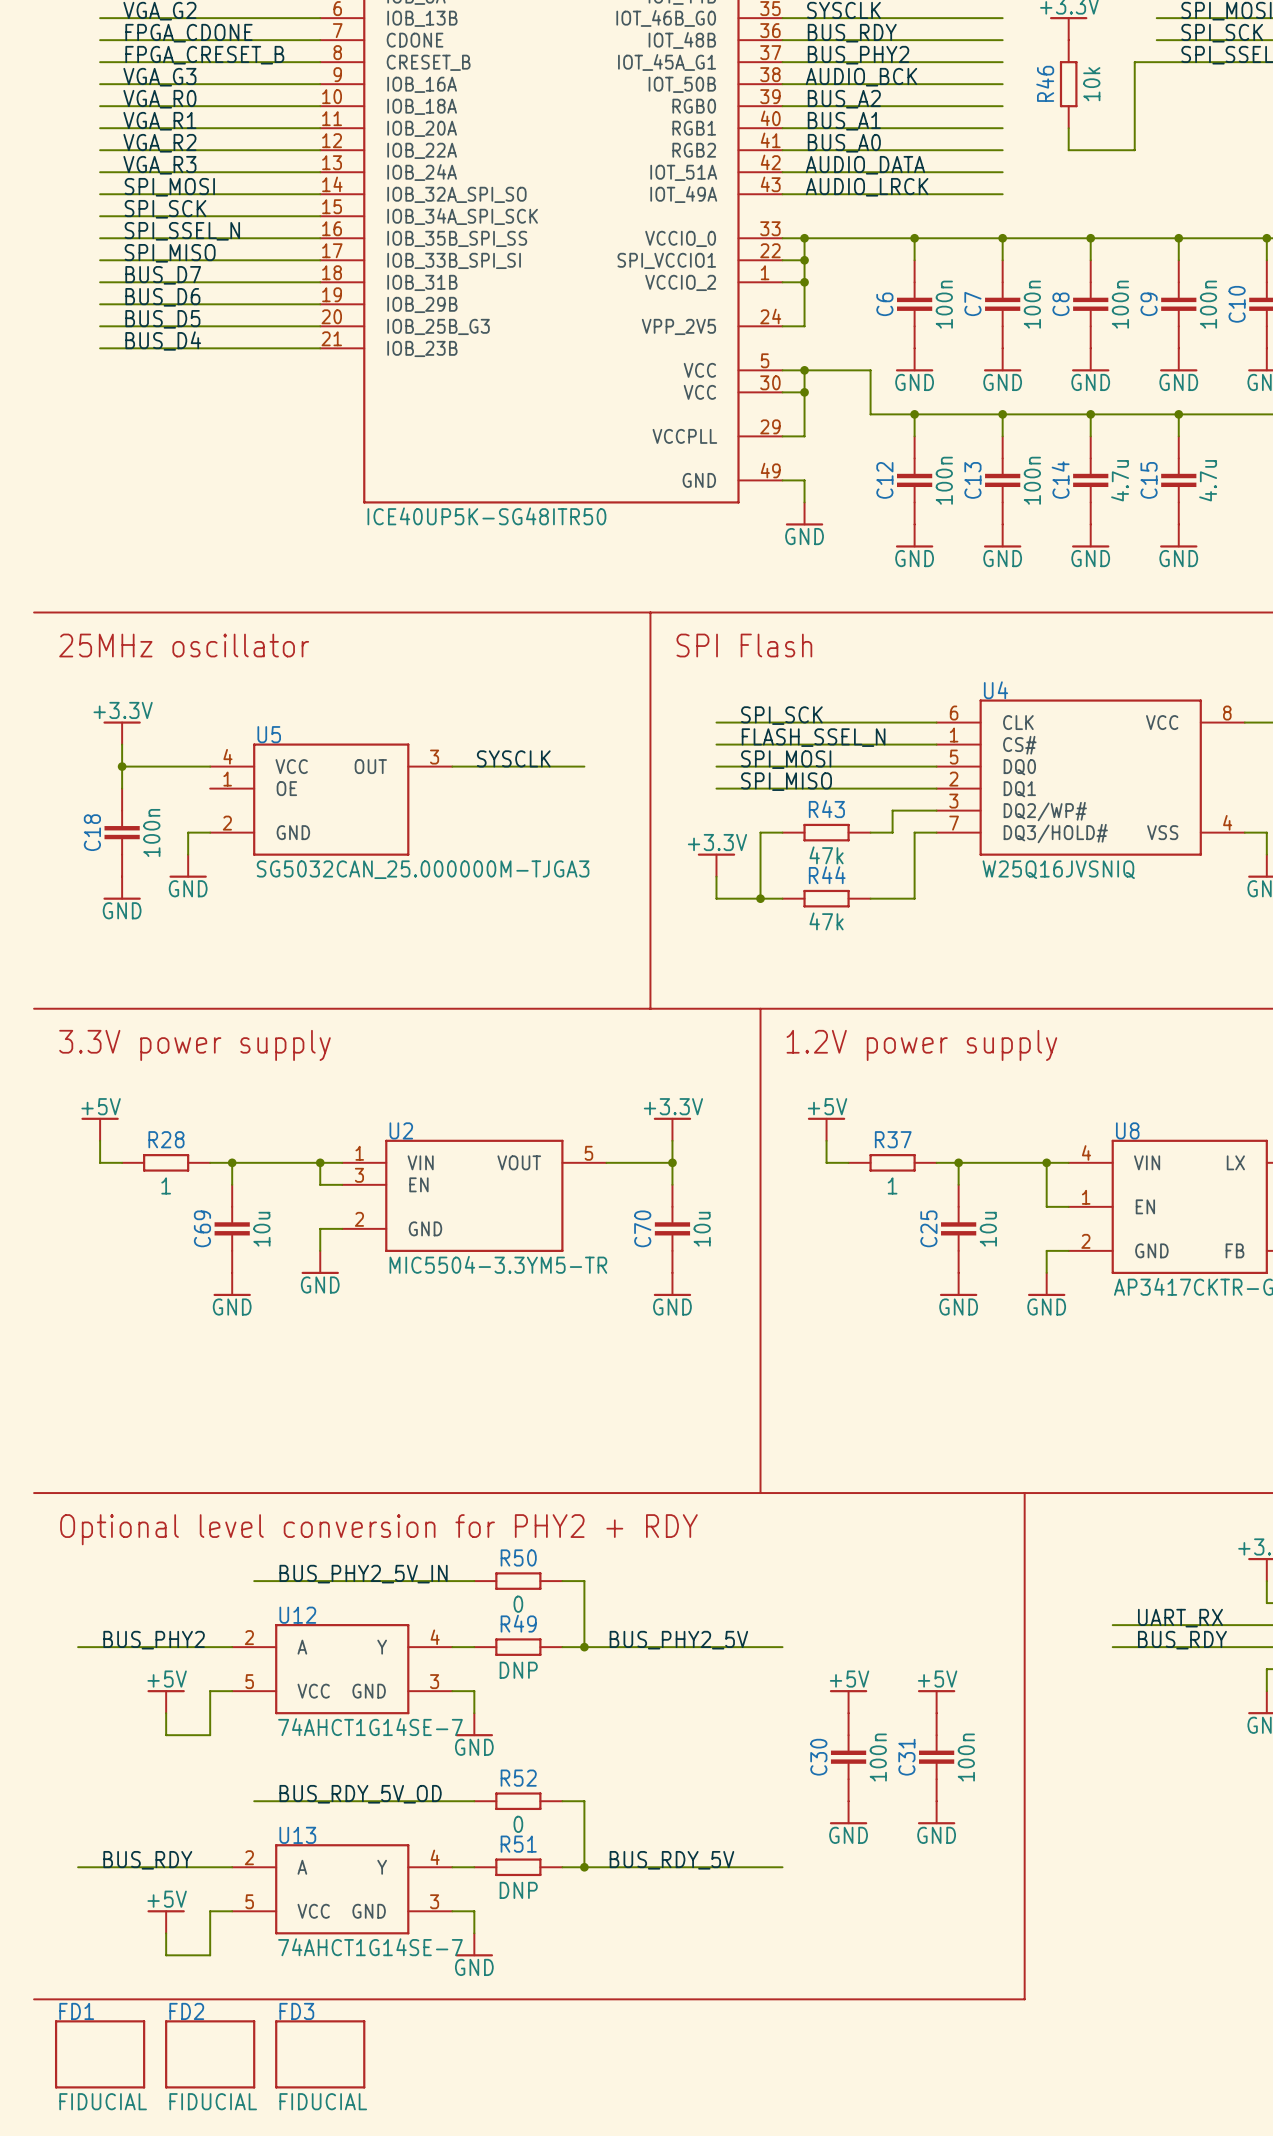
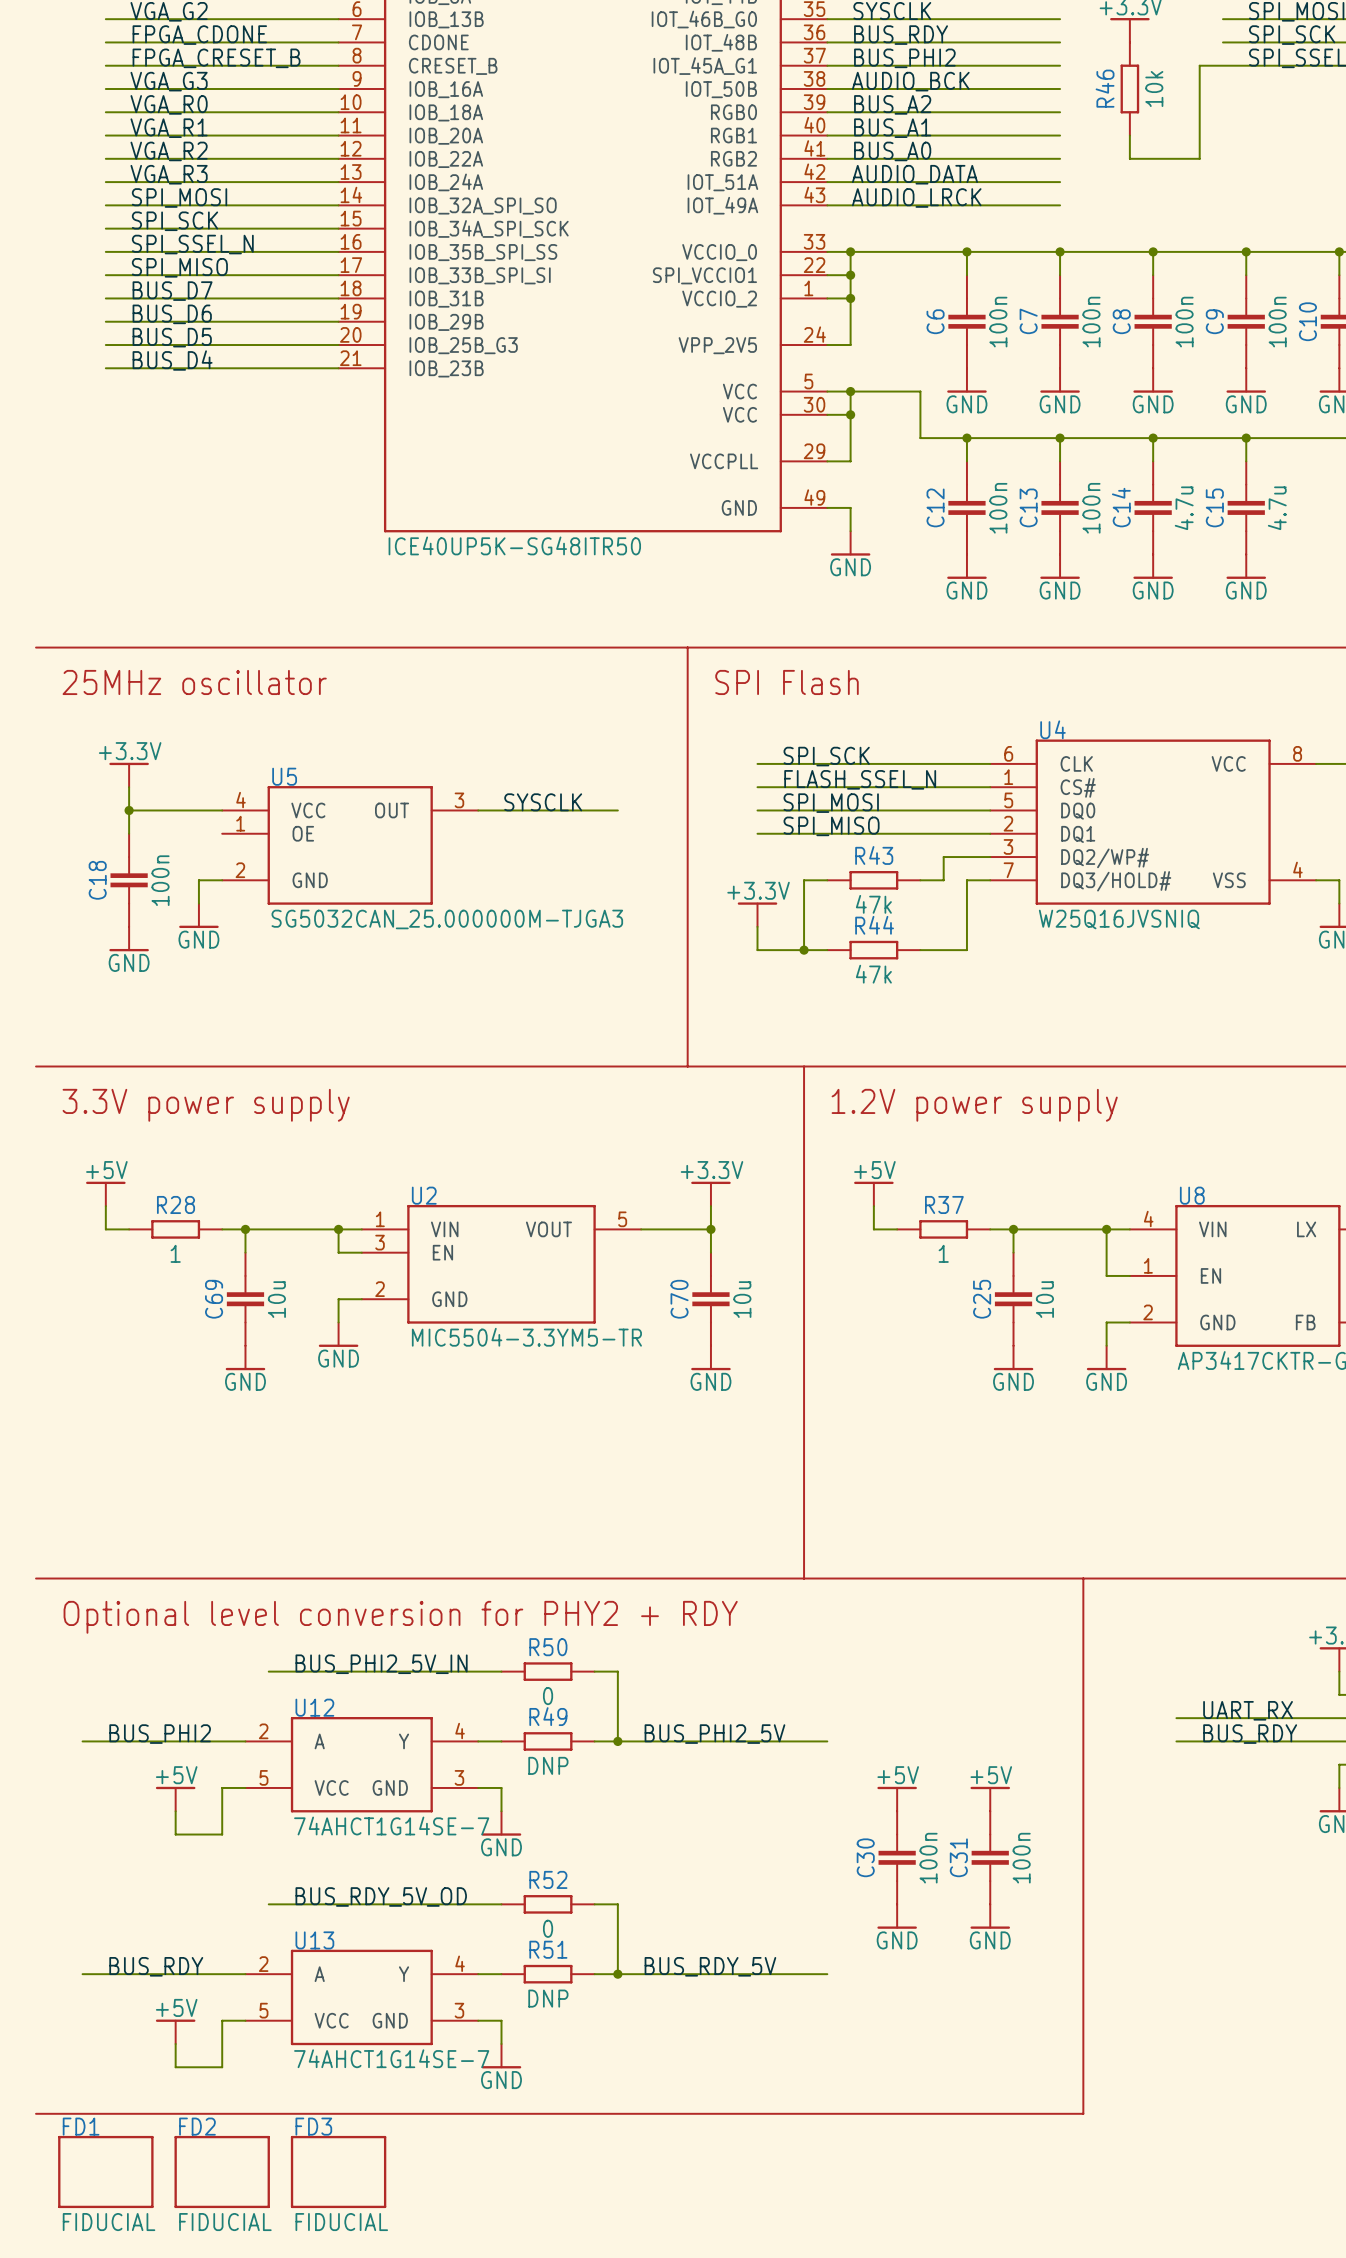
label: BUS_PHY2 (858, 55) -> BUS_PHI2 (904, 58)
label: BUS_PHY2_5V_IN (363, 1574) -> BUS_PHI2_5V_IN (381, 1664)
label: BUS_PHY2 (154, 1640) -> BUS_PHI2 (160, 1734)
label: BUS_PHY2_5V (678, 1640) -> BUS_PHI2_5V (714, 1734)

